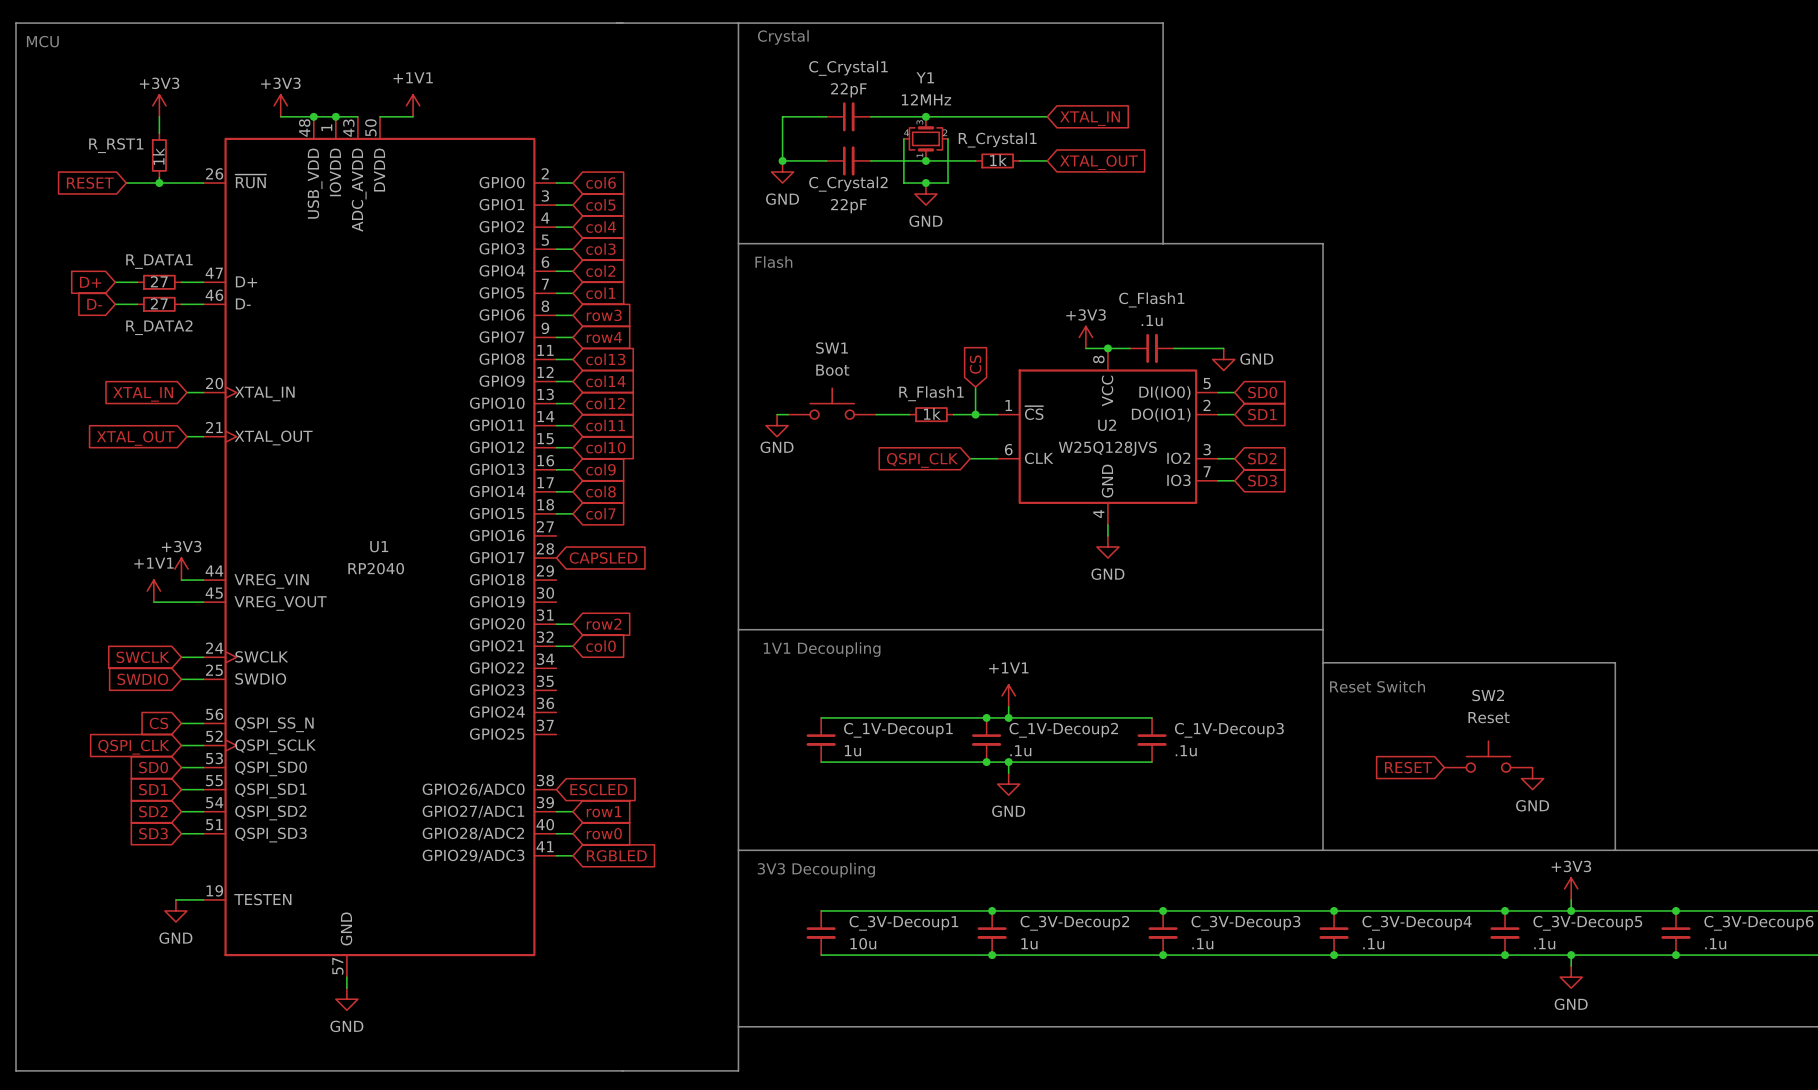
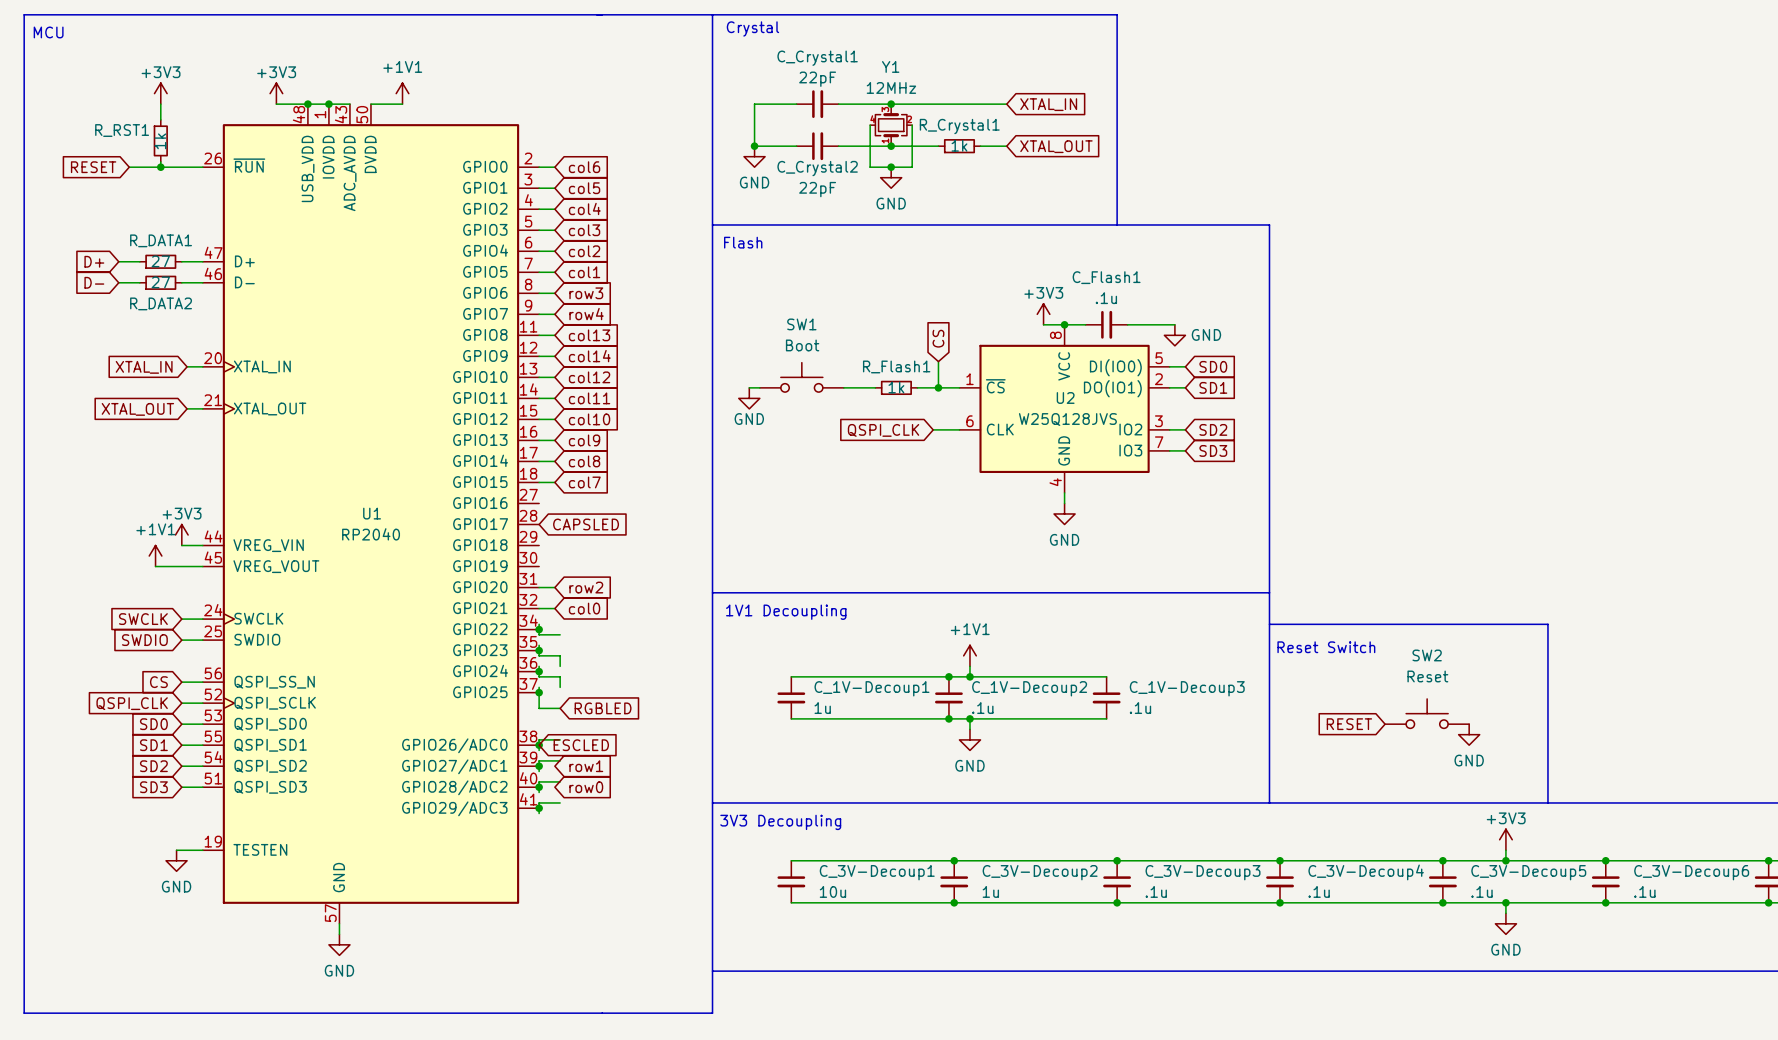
wire: none -> (539, 624) (539, 634) (560, 634)
junction: none -> (539, 629)
wire: none -> (539, 645) (539, 655) (560, 655) (560, 666)
junction: none -> (539, 650)
wire: none -> (539, 666) (539, 676) (560, 676) (560, 687)
junction: none -> (539, 671)
wire: none -> (539, 687) (539, 708) (560, 708)
junction: none -> (539, 692)
wire: none -> (560, 739) (539, 739) (539, 750)
junction: none -> (539, 745)
wire: none -> (560, 760) (539, 760) (539, 771)
wire: (556, 811) (573, 811) -> none
junction: none -> (539, 766)
wire: none -> (560, 781) (539, 781) (539, 792)
wire: (556, 833) (573, 833) -> none
junction: none -> (539, 787)
wire: none -> (560, 802) (539, 802) (539, 813)
wire: (556, 855) (573, 855) -> none
junction: none -> (539, 808)
global label position: RGBLED (616, 855) -> RGBLED (603, 708)

